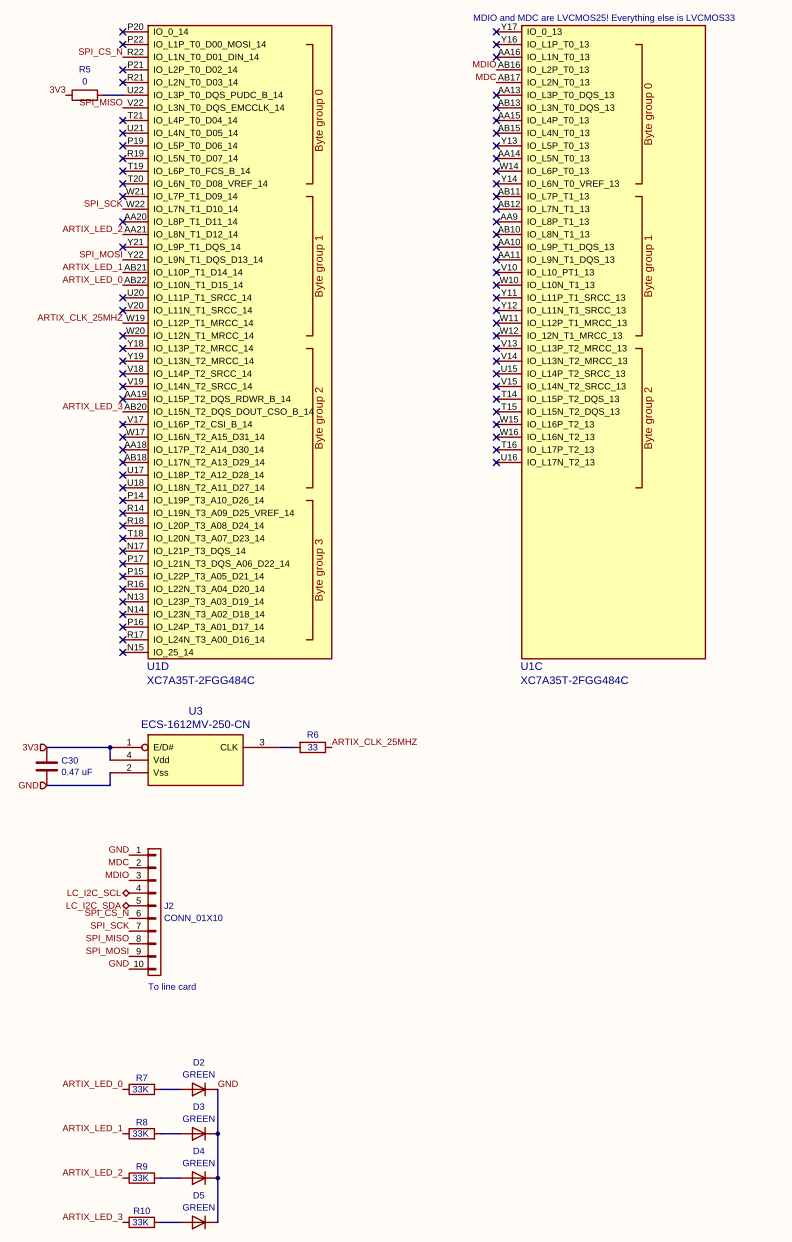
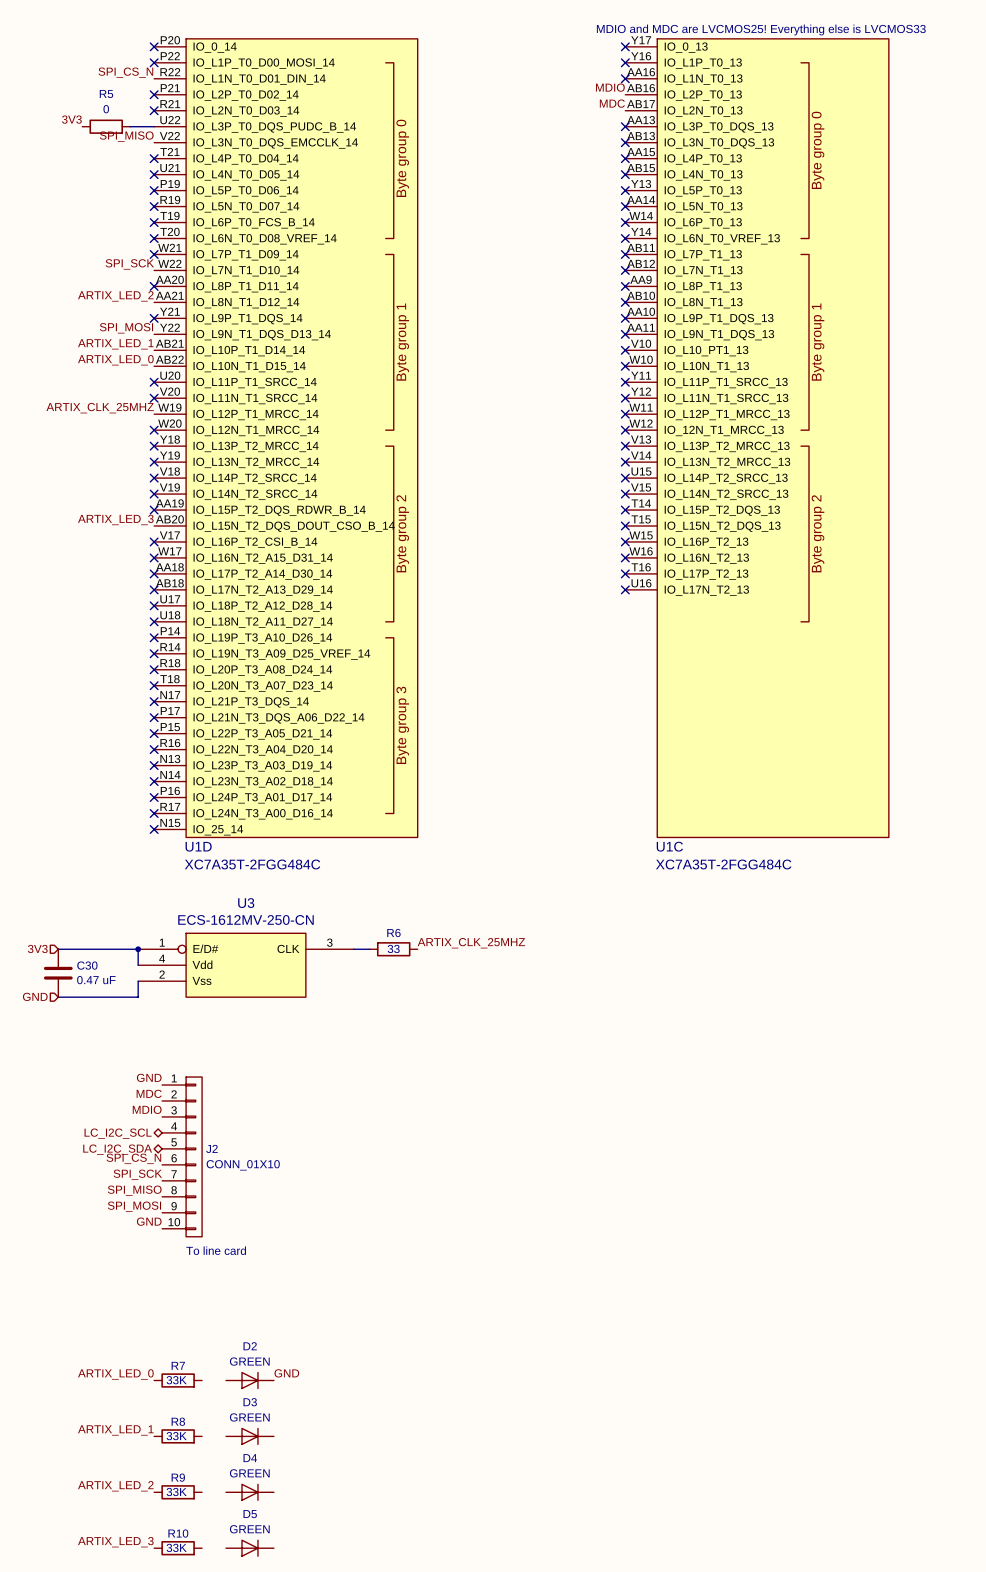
wire: (160, 1089) (179, 1089) -> none
wire: (217, 1089) (217, 1222) -> none
wire: (160, 1133) (179, 1133) -> none
junction: (217, 1133) -> none
wire: (160, 1178) (179, 1178) -> none
junction: (217, 1178) -> none
wire: (160, 1222) (179, 1222) -> none

